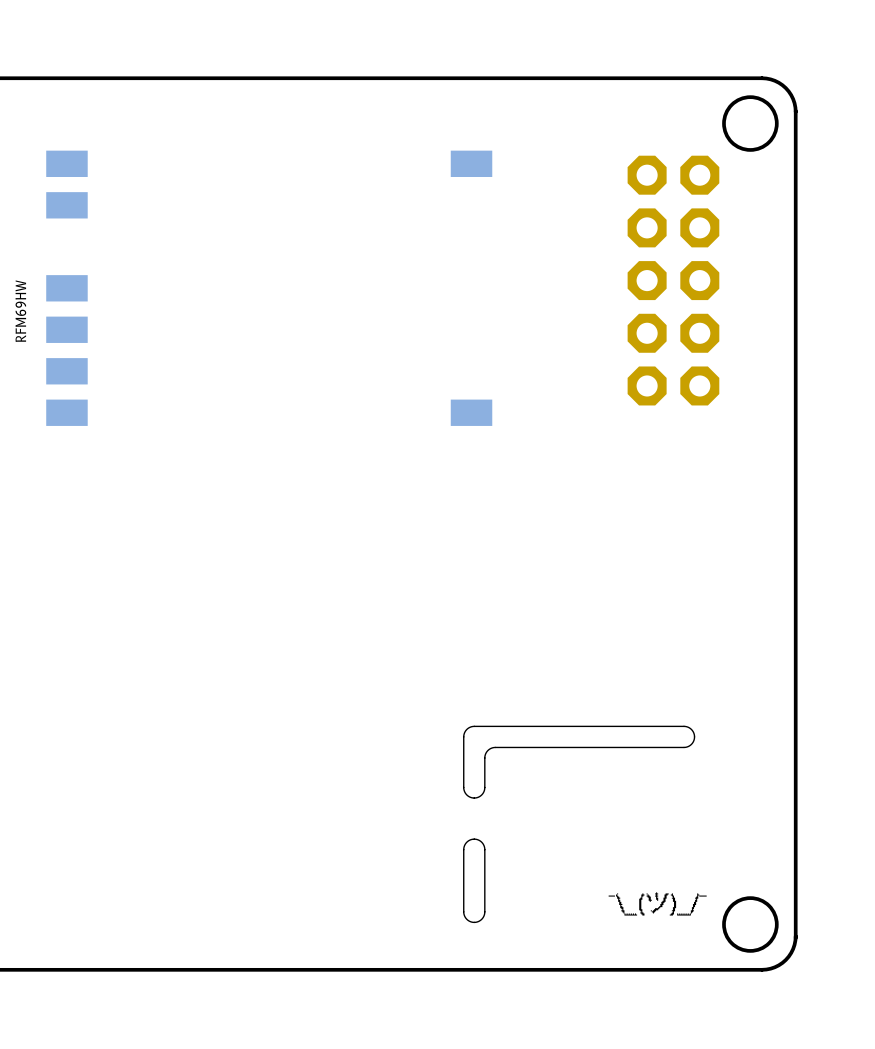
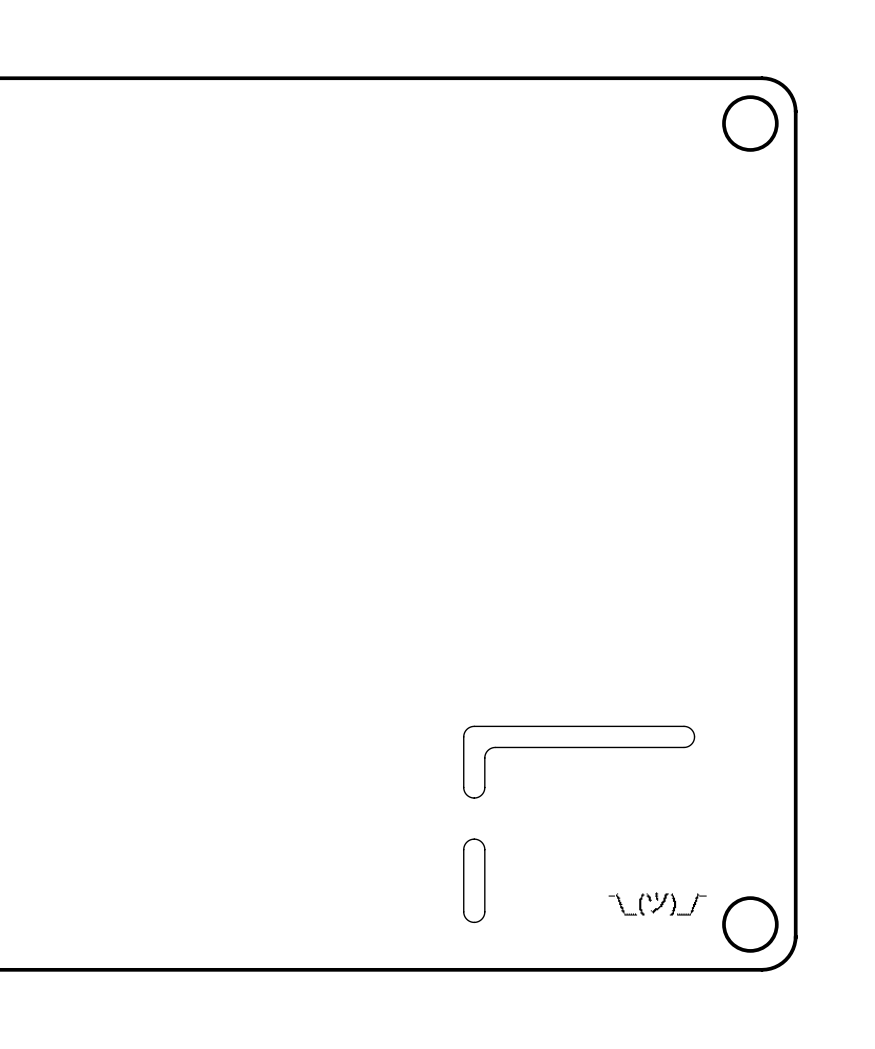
part: (673, 280) -> none
part: RFM69HW (269, 288) -> none

